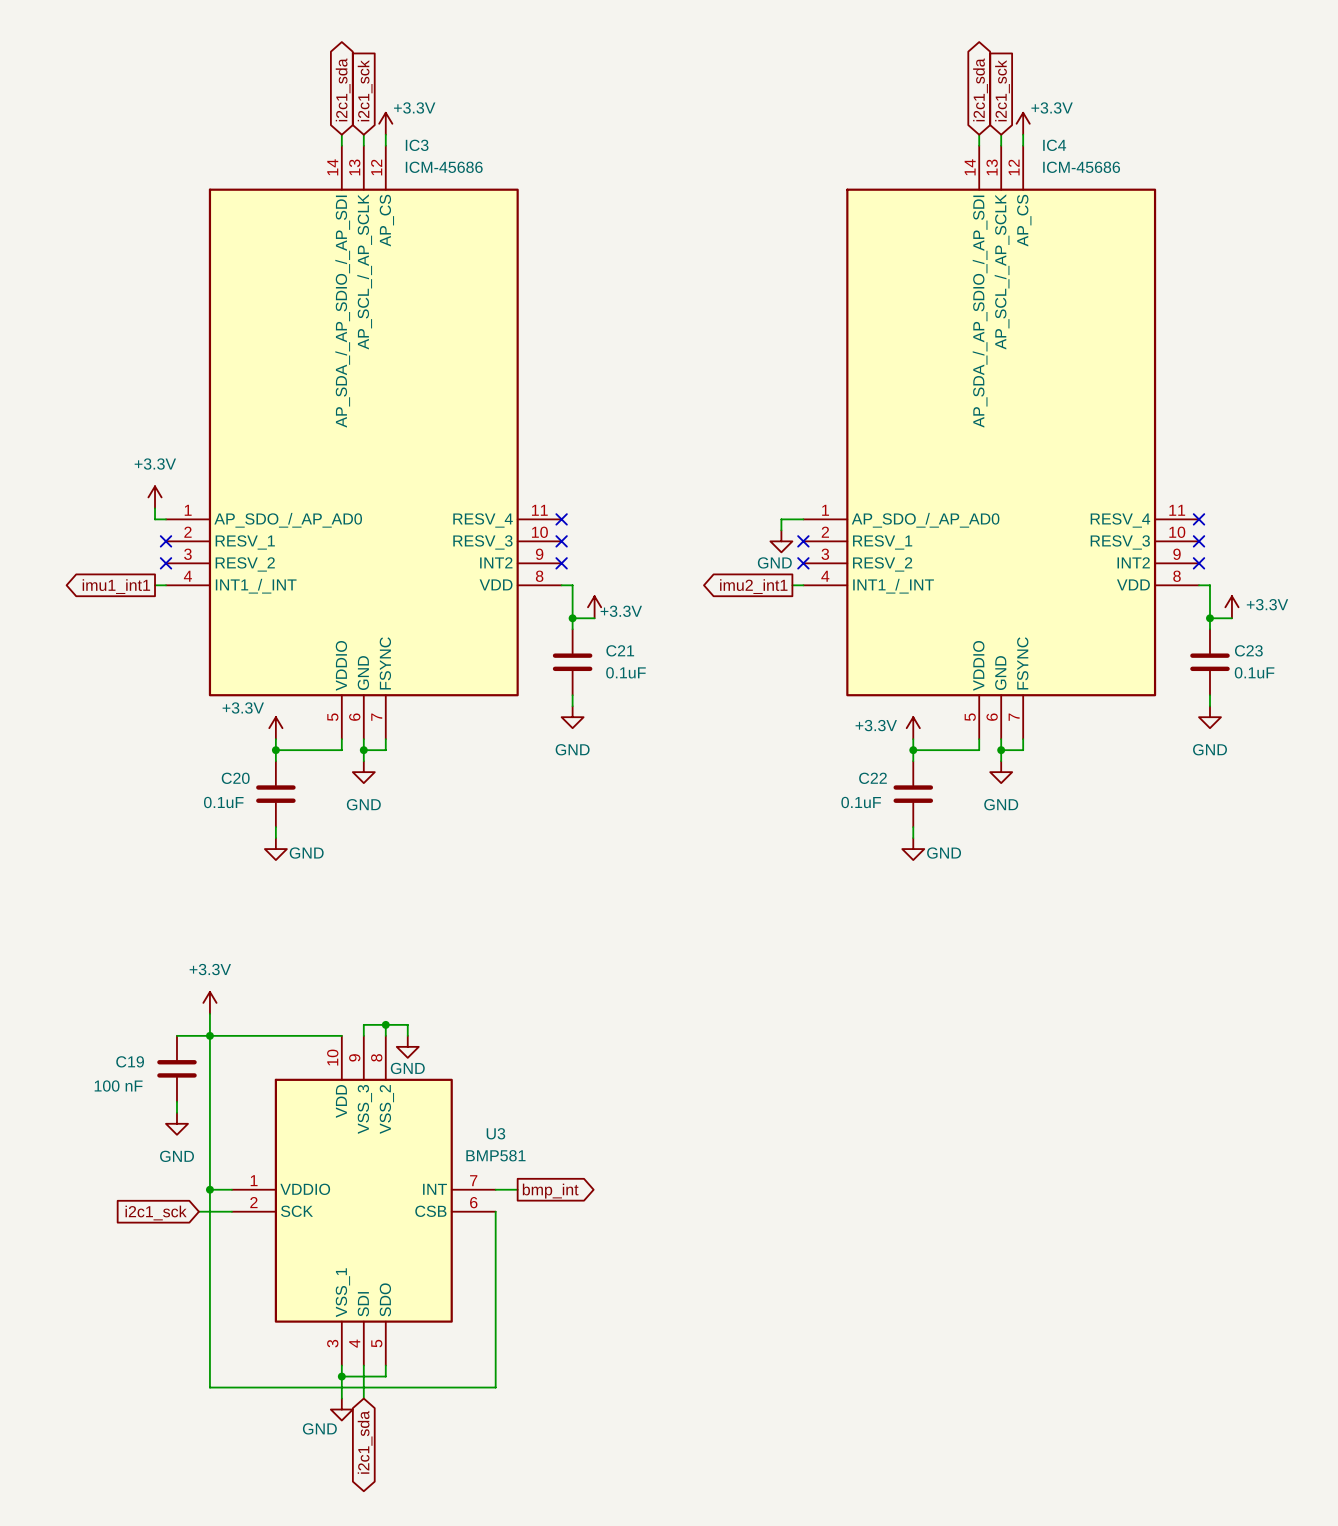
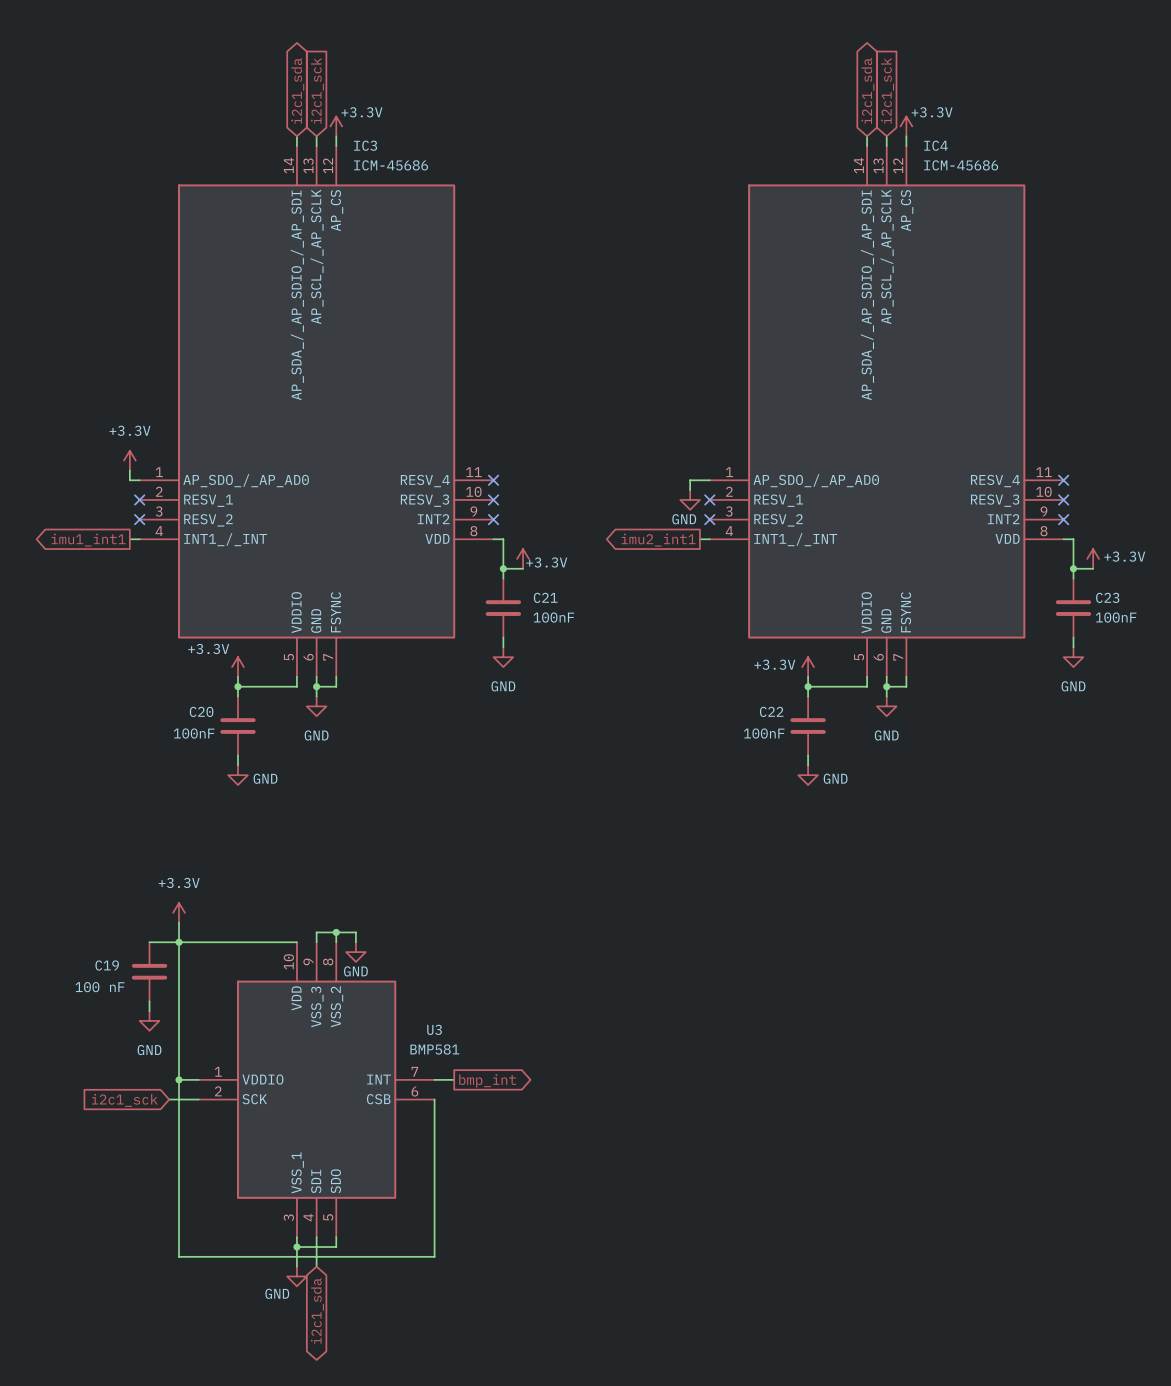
C21 value: 0.1uF (625, 672) -> 100nF (553, 617)
C23 value: 0.1uF (1254, 672) -> 100nF (1116, 617)
C20 value: 0.1uF (223, 802) -> 100nF (194, 733)
C22 value: 0.1uF (861, 802) -> 100nF (764, 733)

